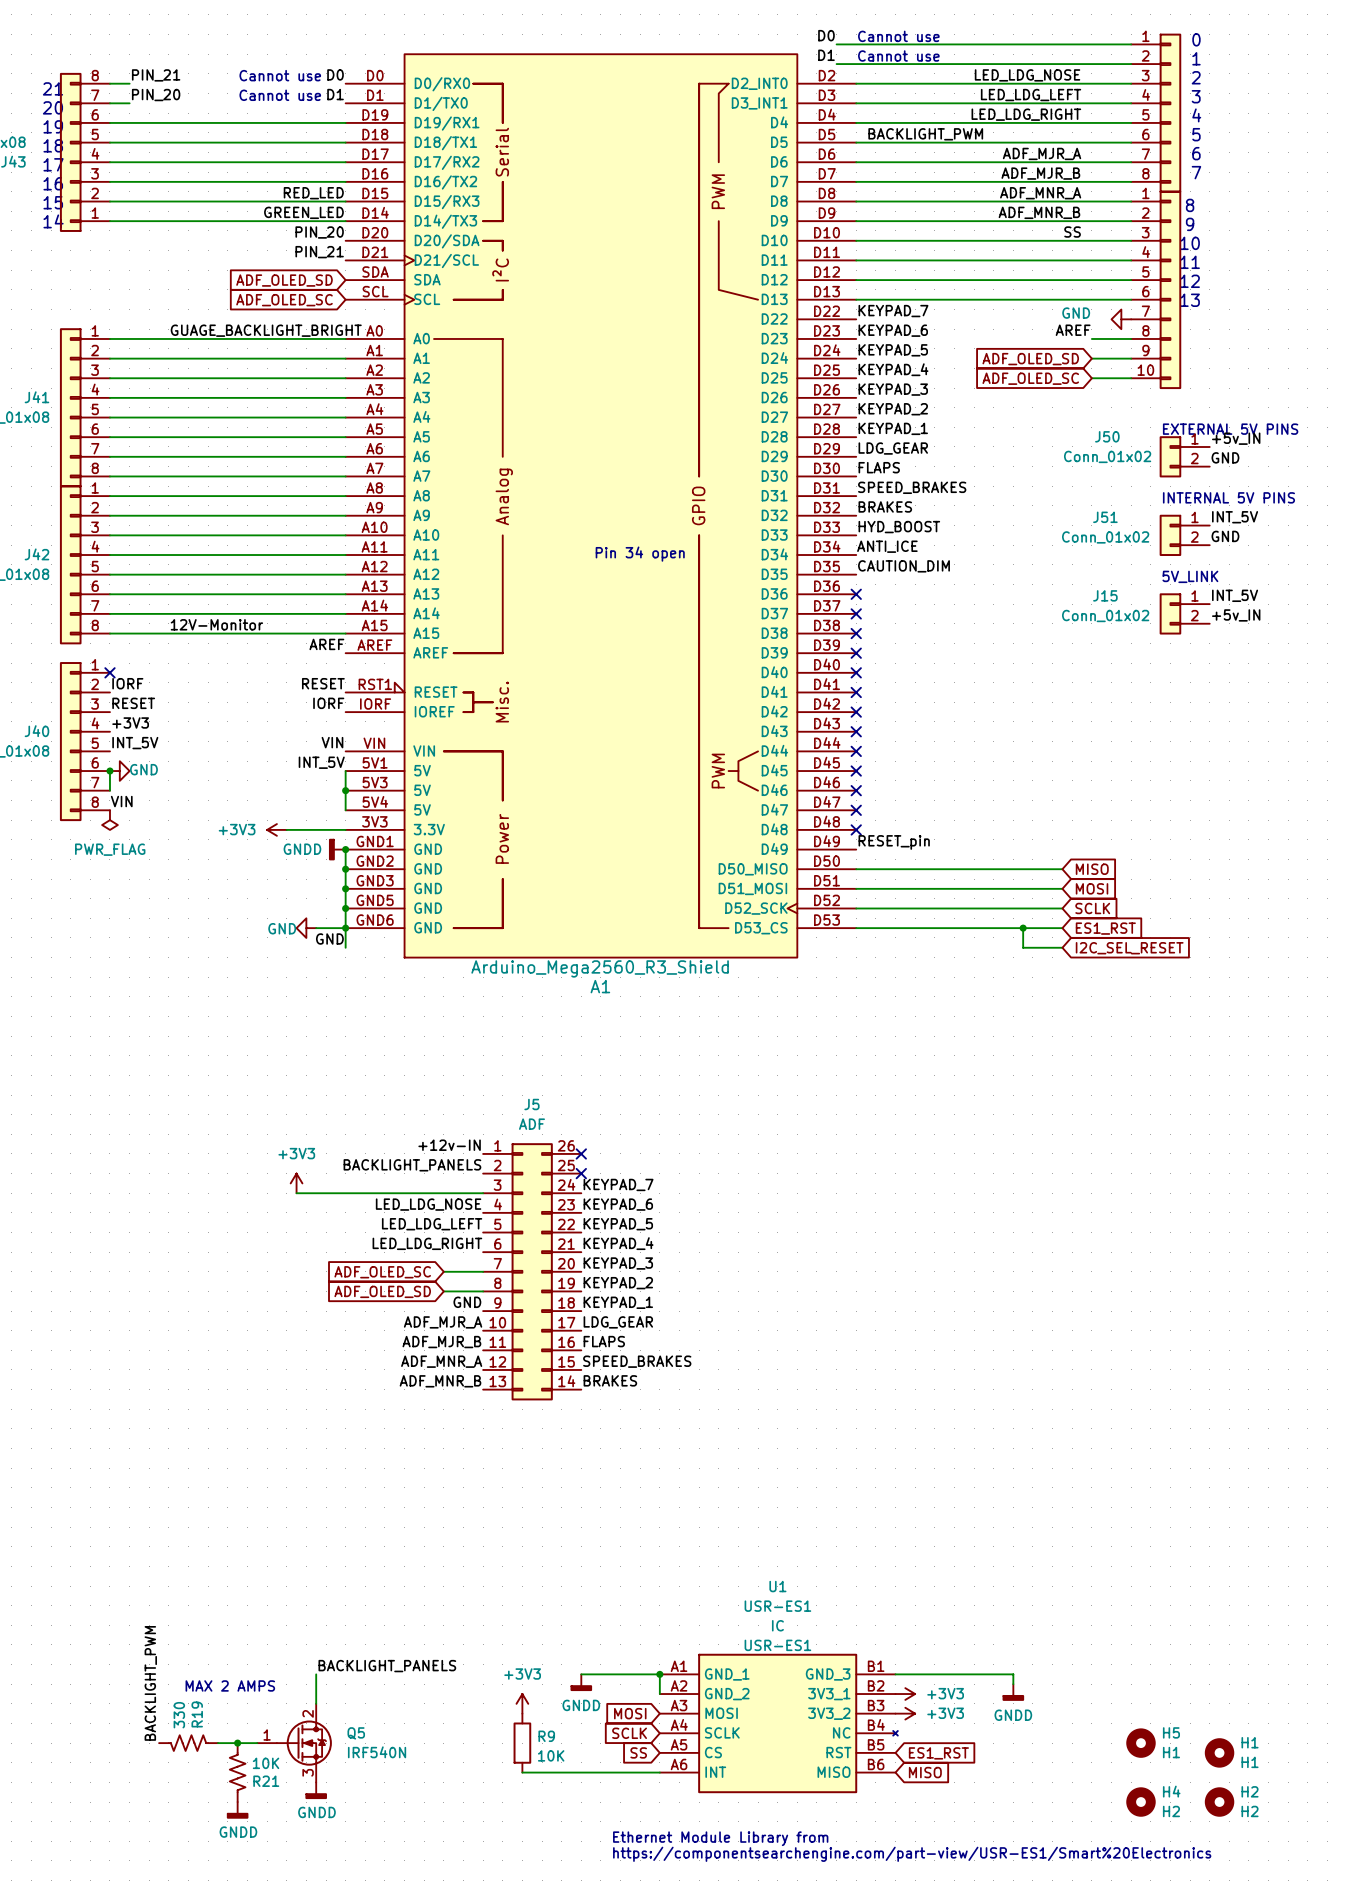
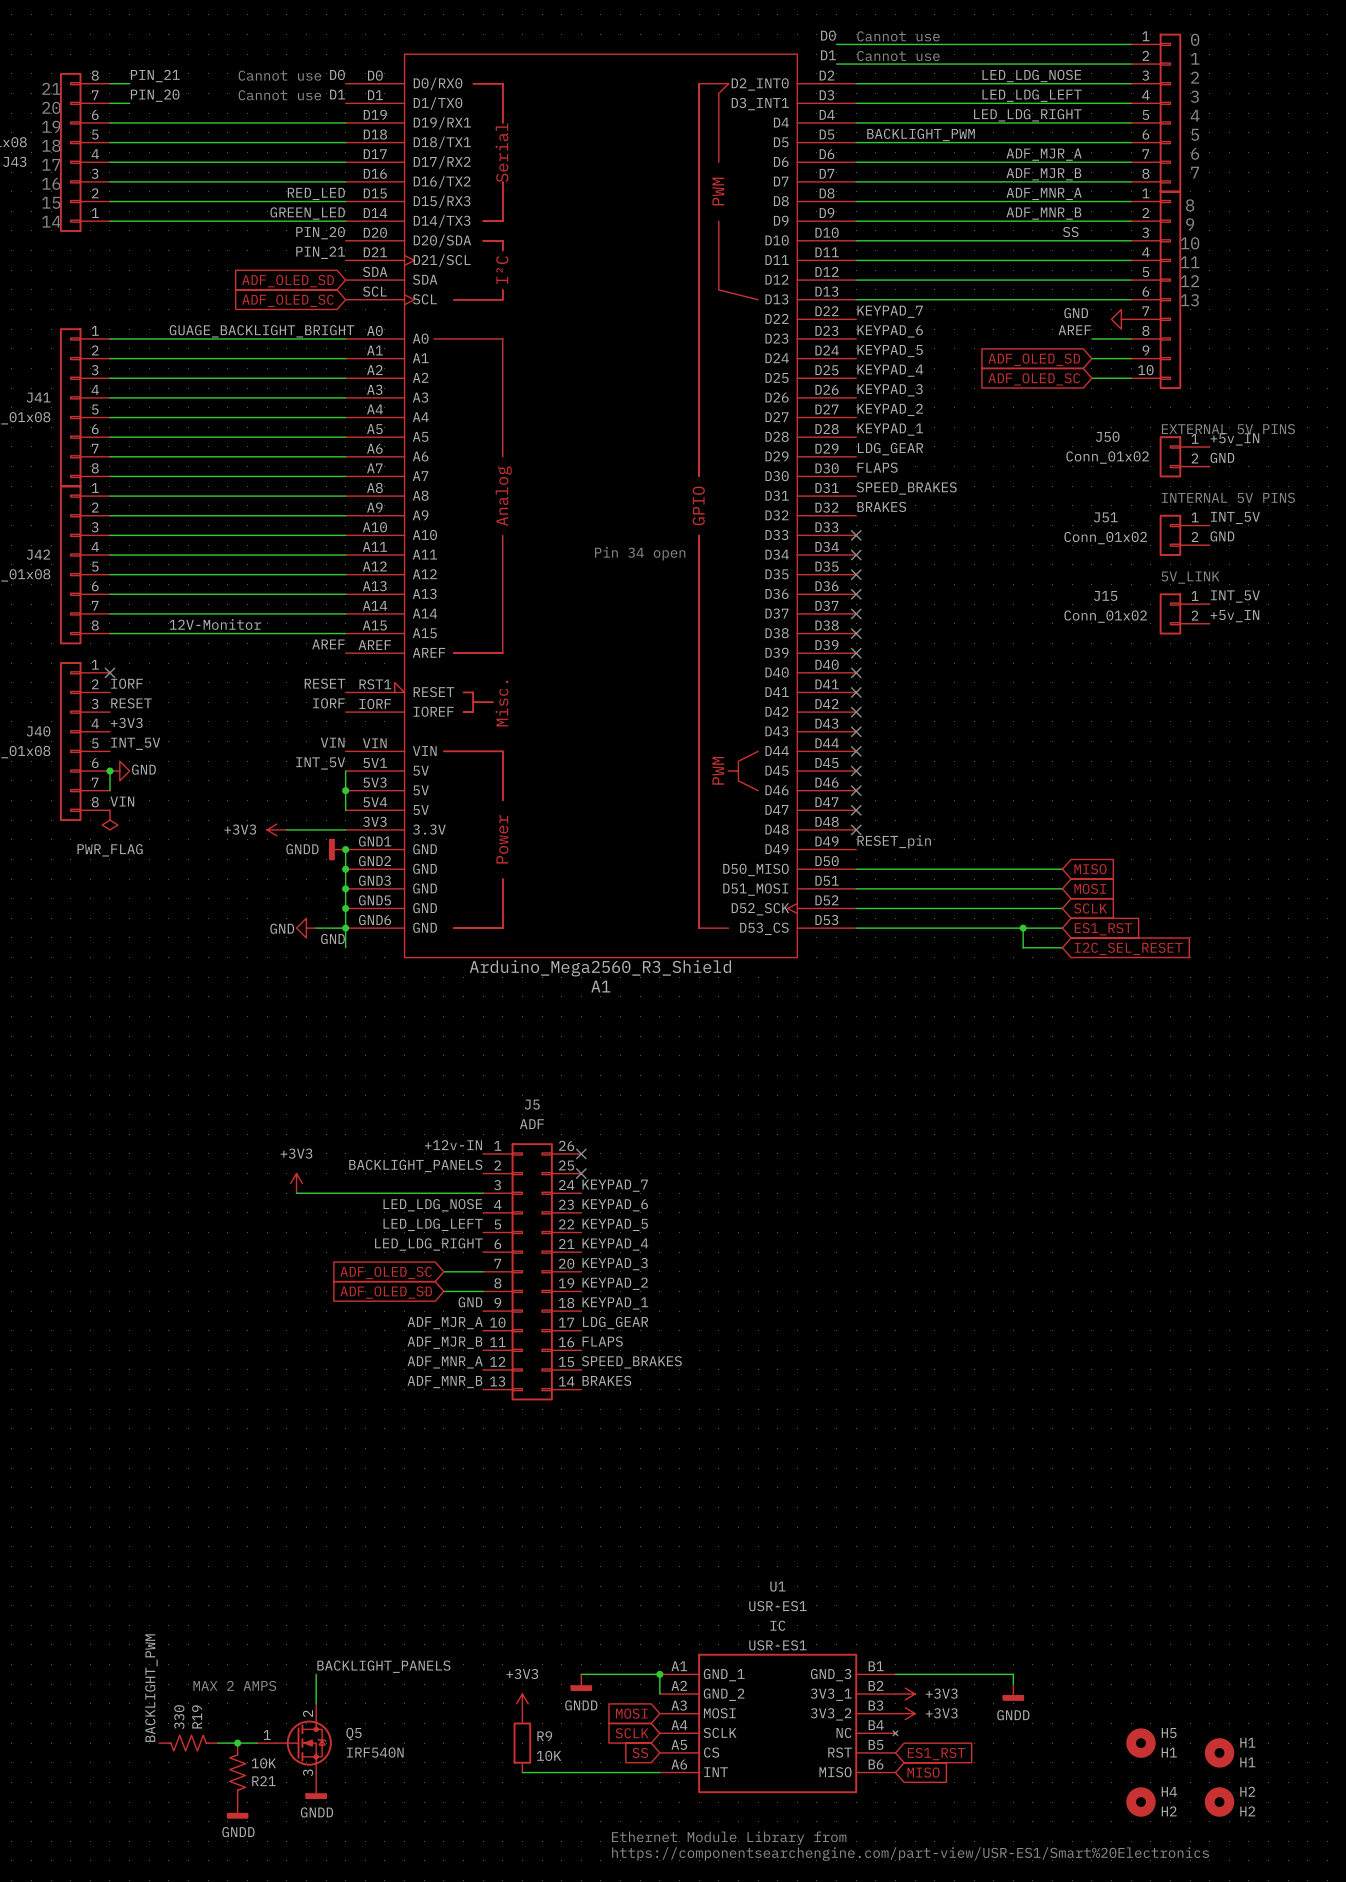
label: HYD_BOOST (899, 527) -> none
no-connect mark: none -> (856, 535)
label: ANTI_ICE (887, 546) -> none
no-connect mark: none -> (856, 555)
label: CAUTION_DIM (904, 566) -> none
no-connect mark: none -> (856, 574)

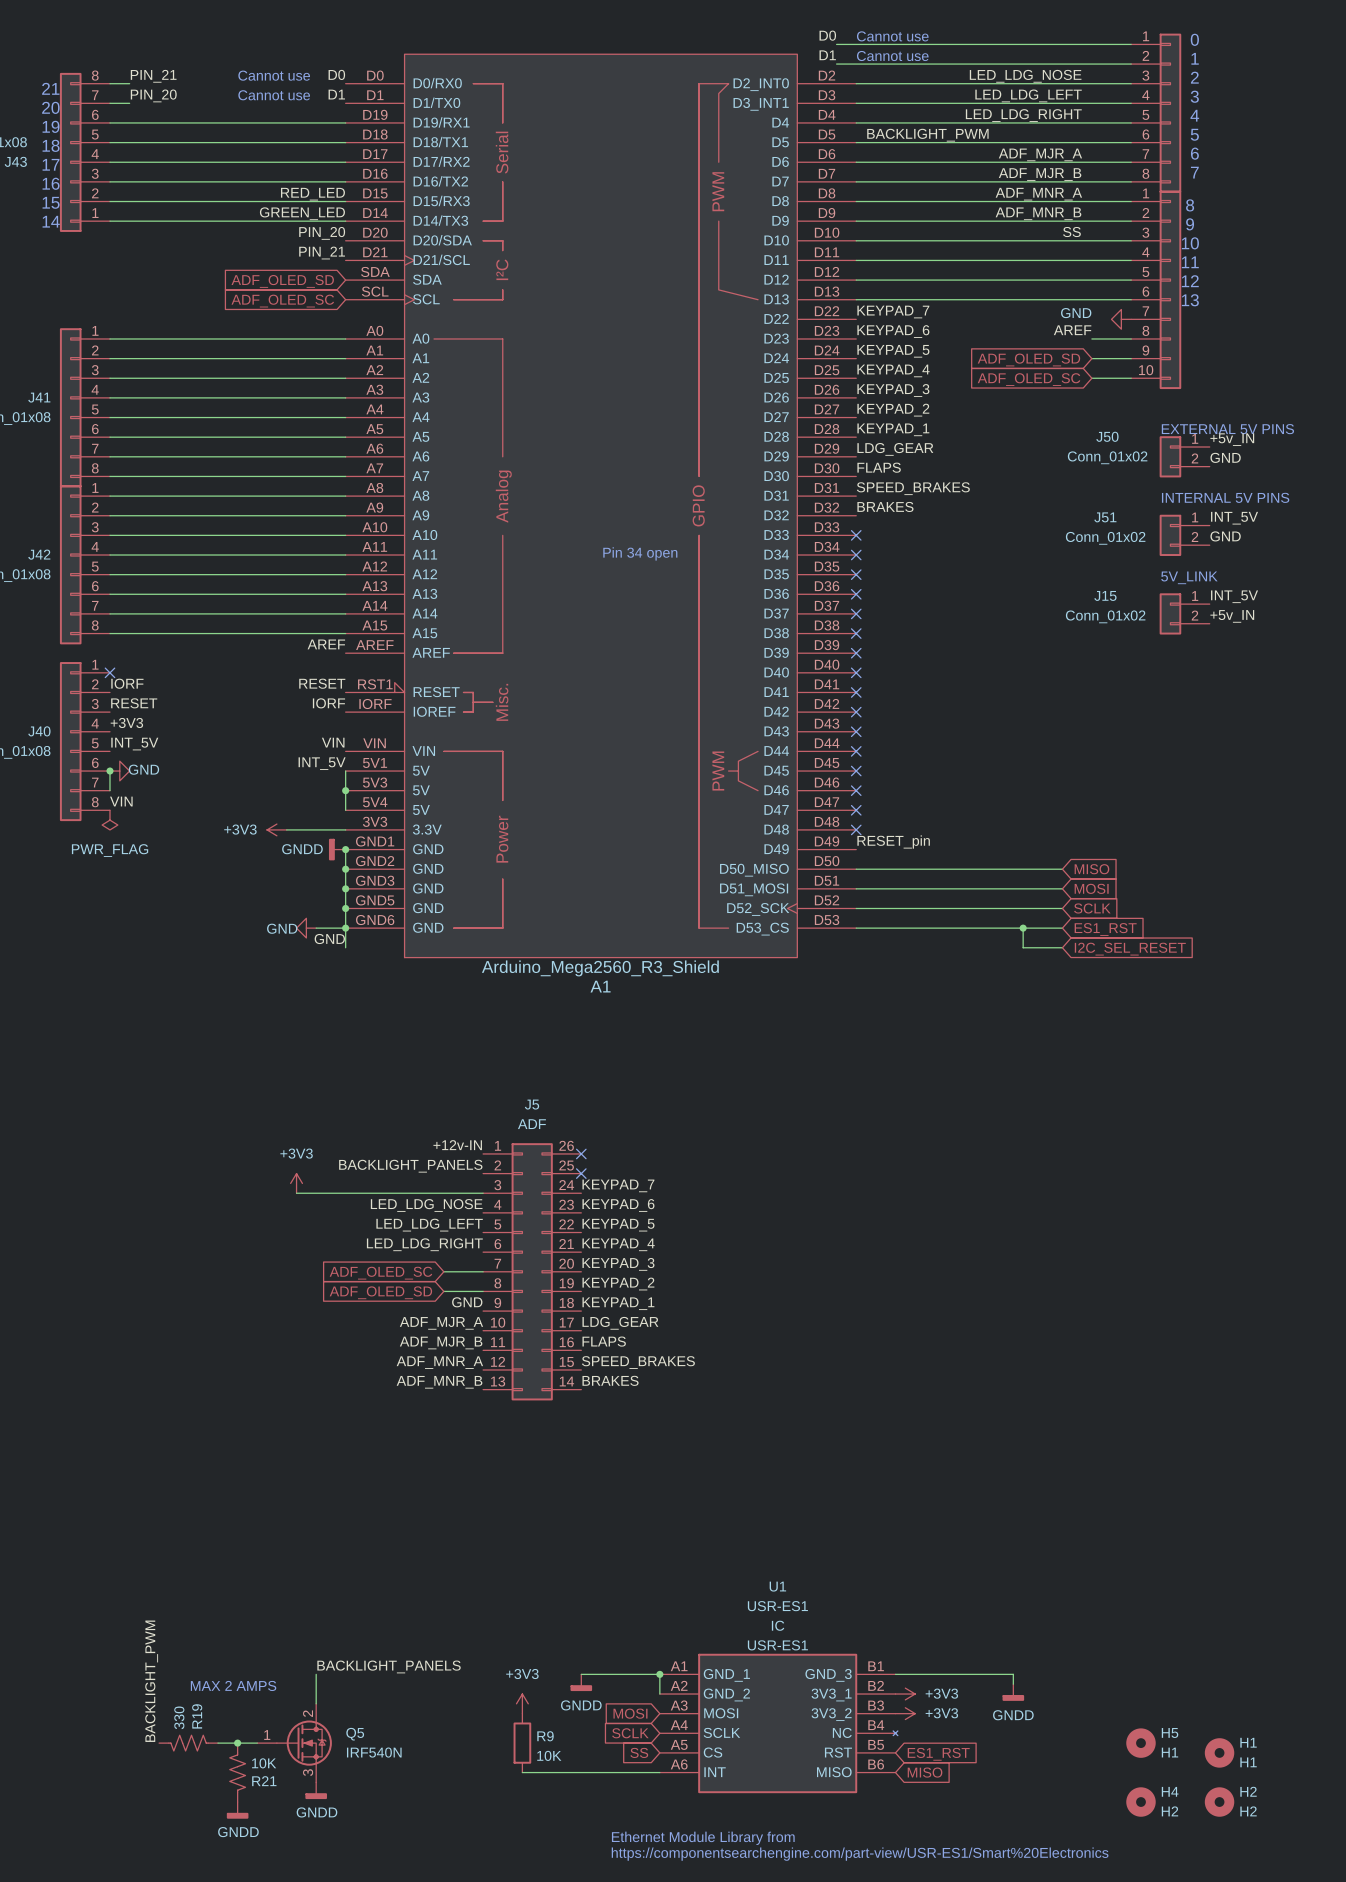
label: GUAGE_BACKLIGHT_BRIGHT (261, 331) -> none
label: 12V-Monitor (215, 624) -> none

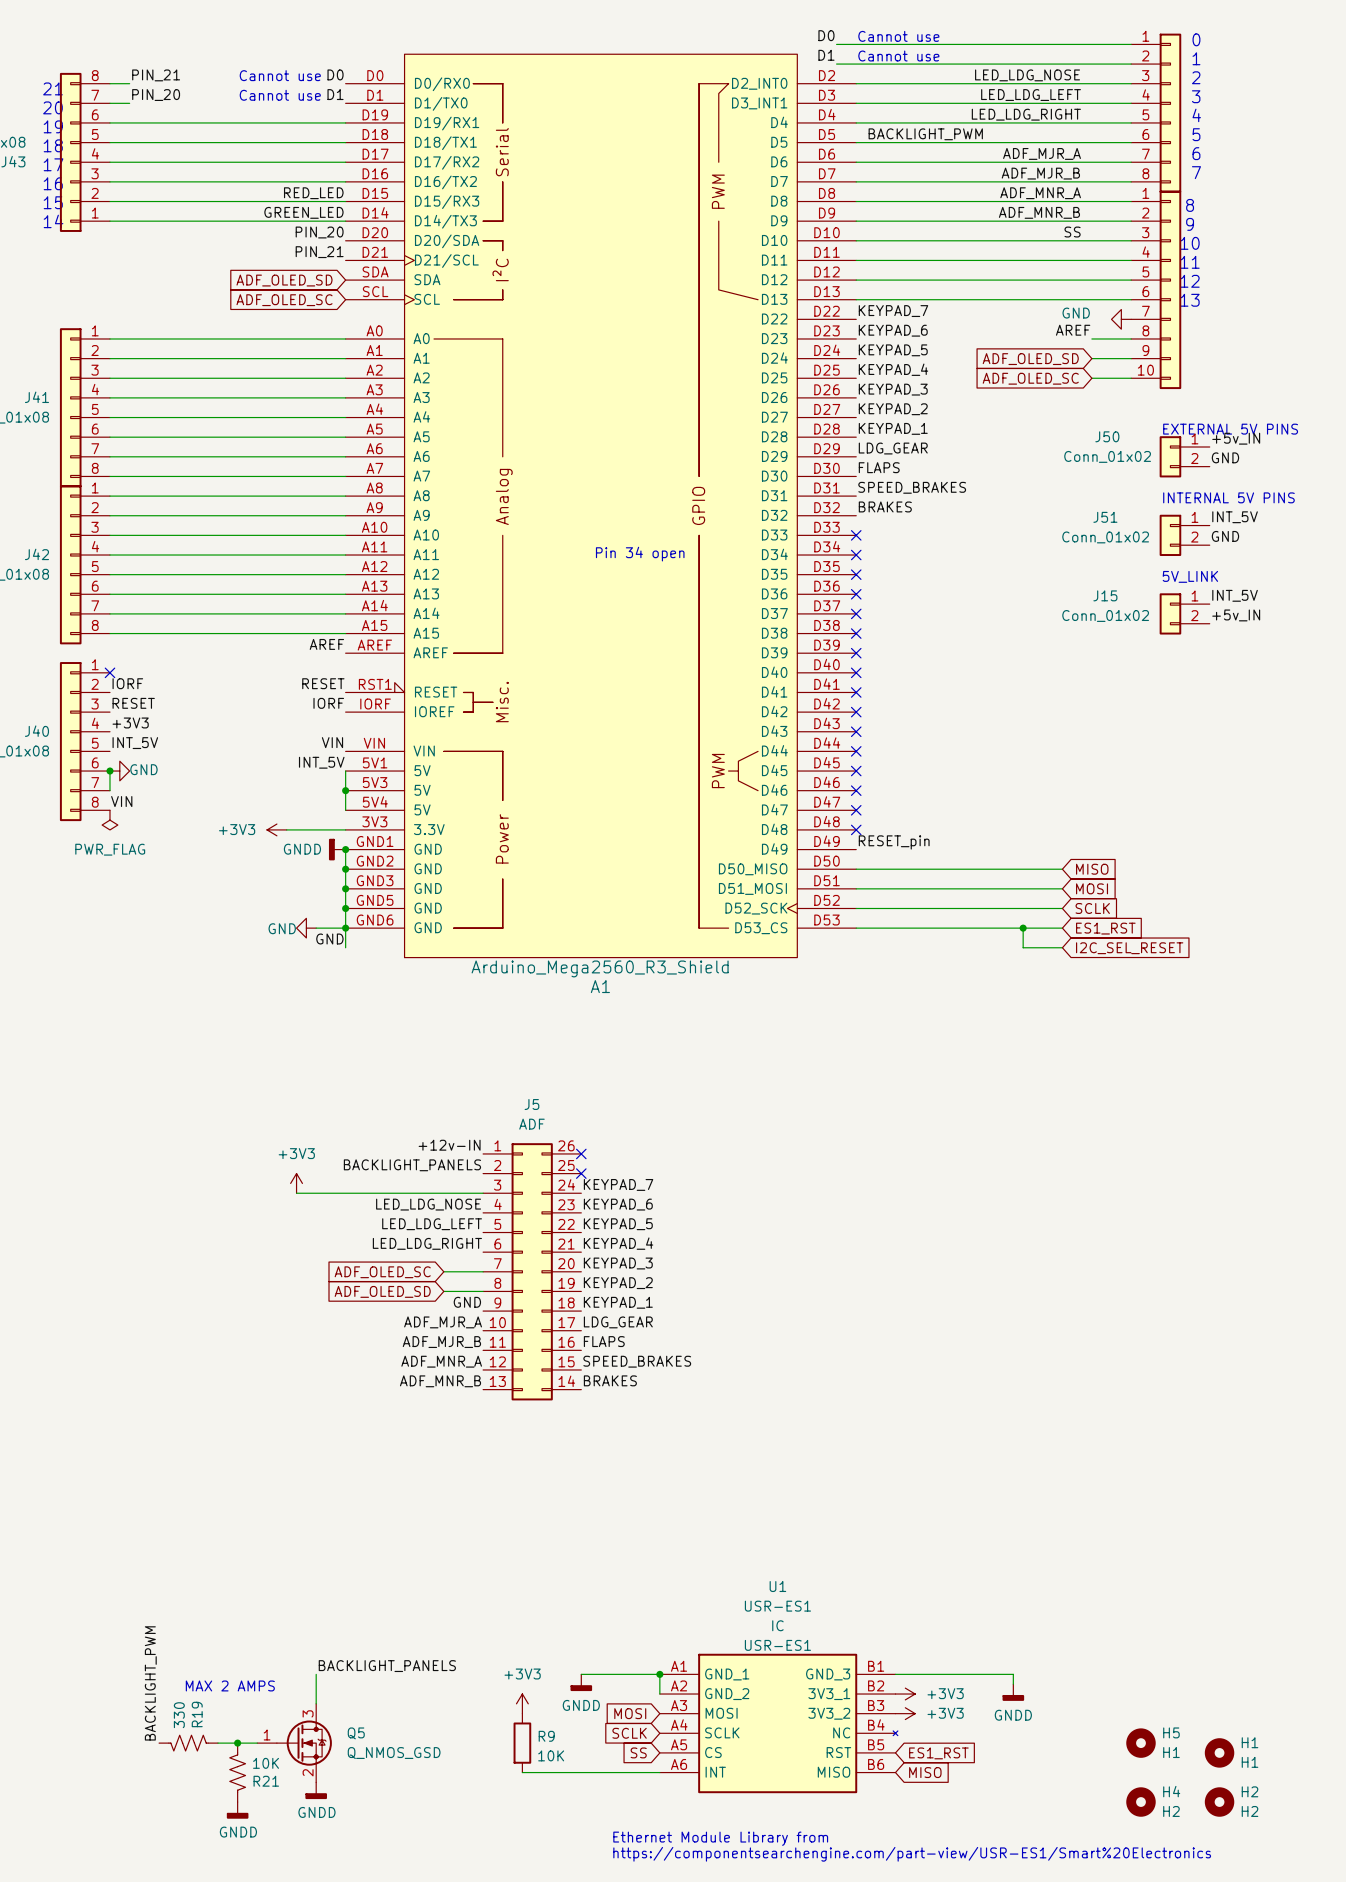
Q5 pin number: 2 (308, 1713) -> 3 (308, 1713)
Q5 value: IRF540N (374, 1752) -> Q_NMOS_GSD (394, 1753)
Q5 pin number: 3 (308, 1772) -> 2 (308, 1772)

